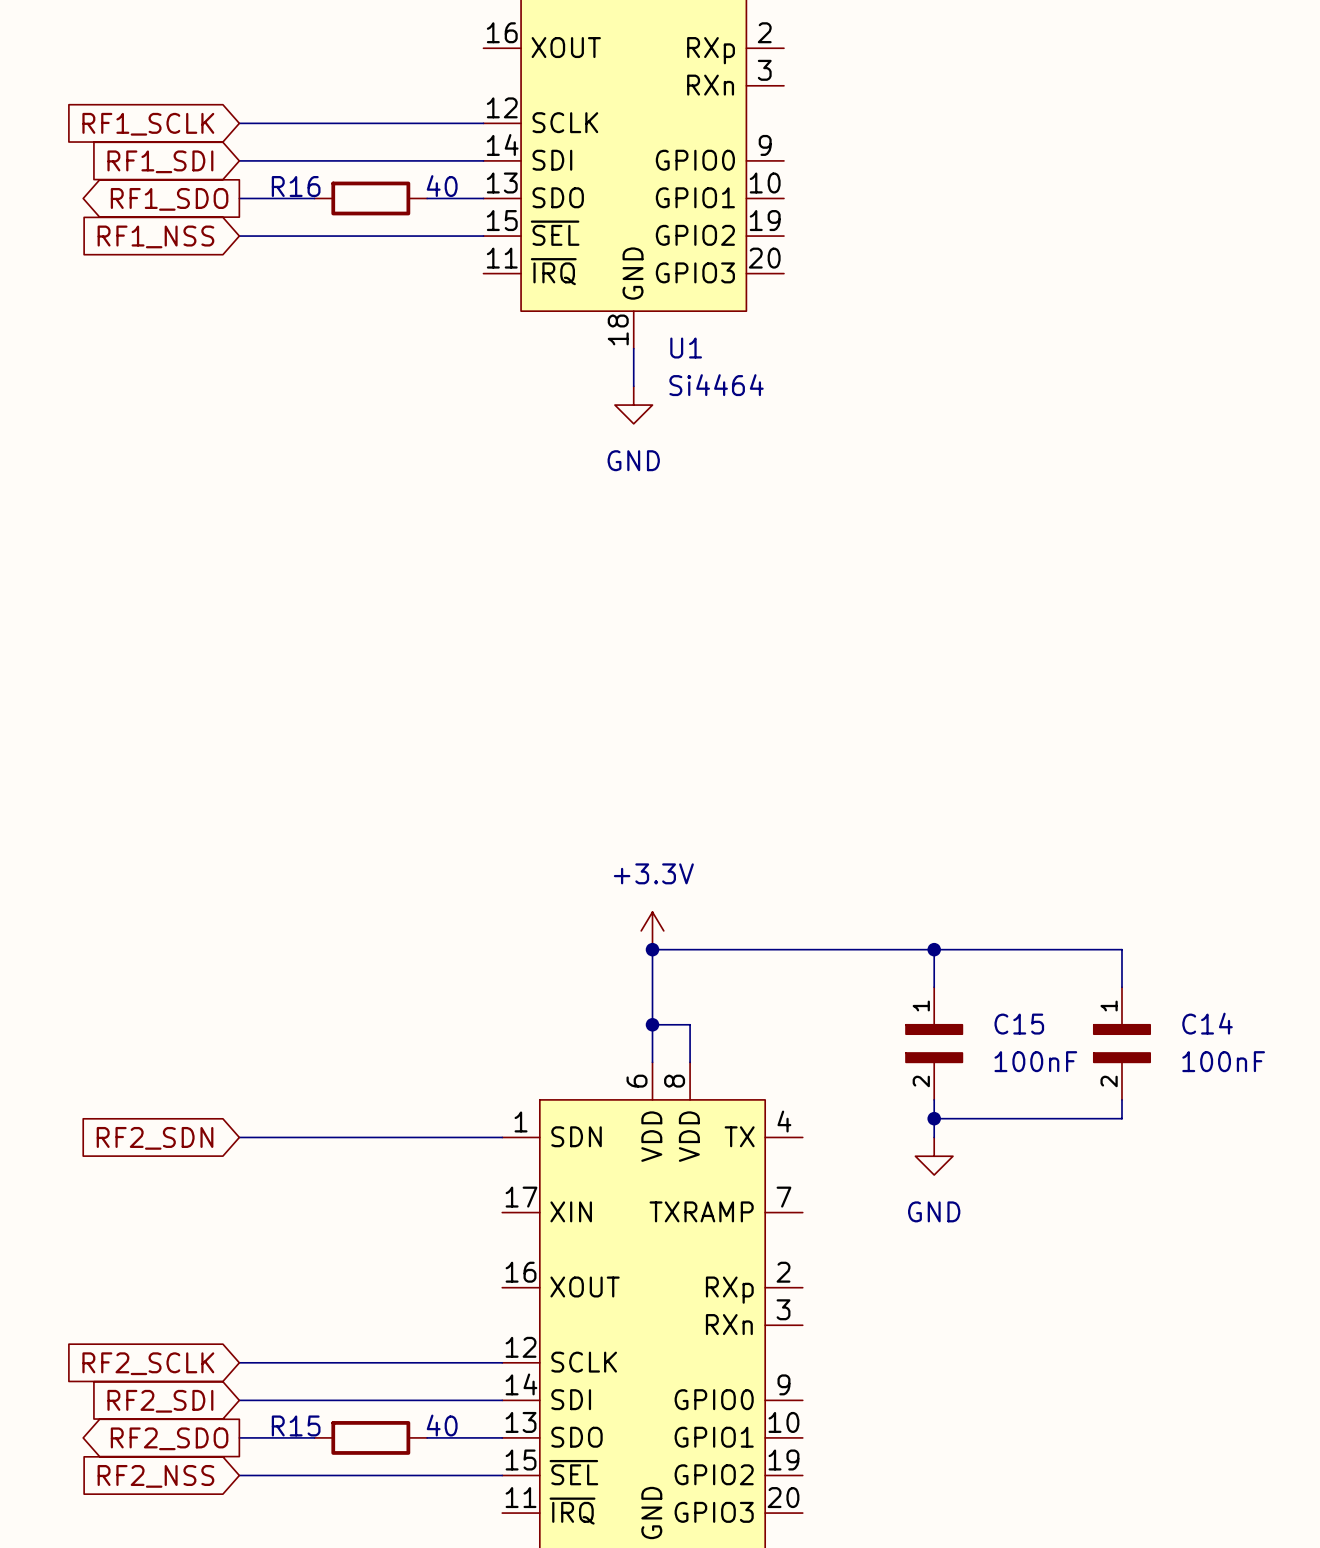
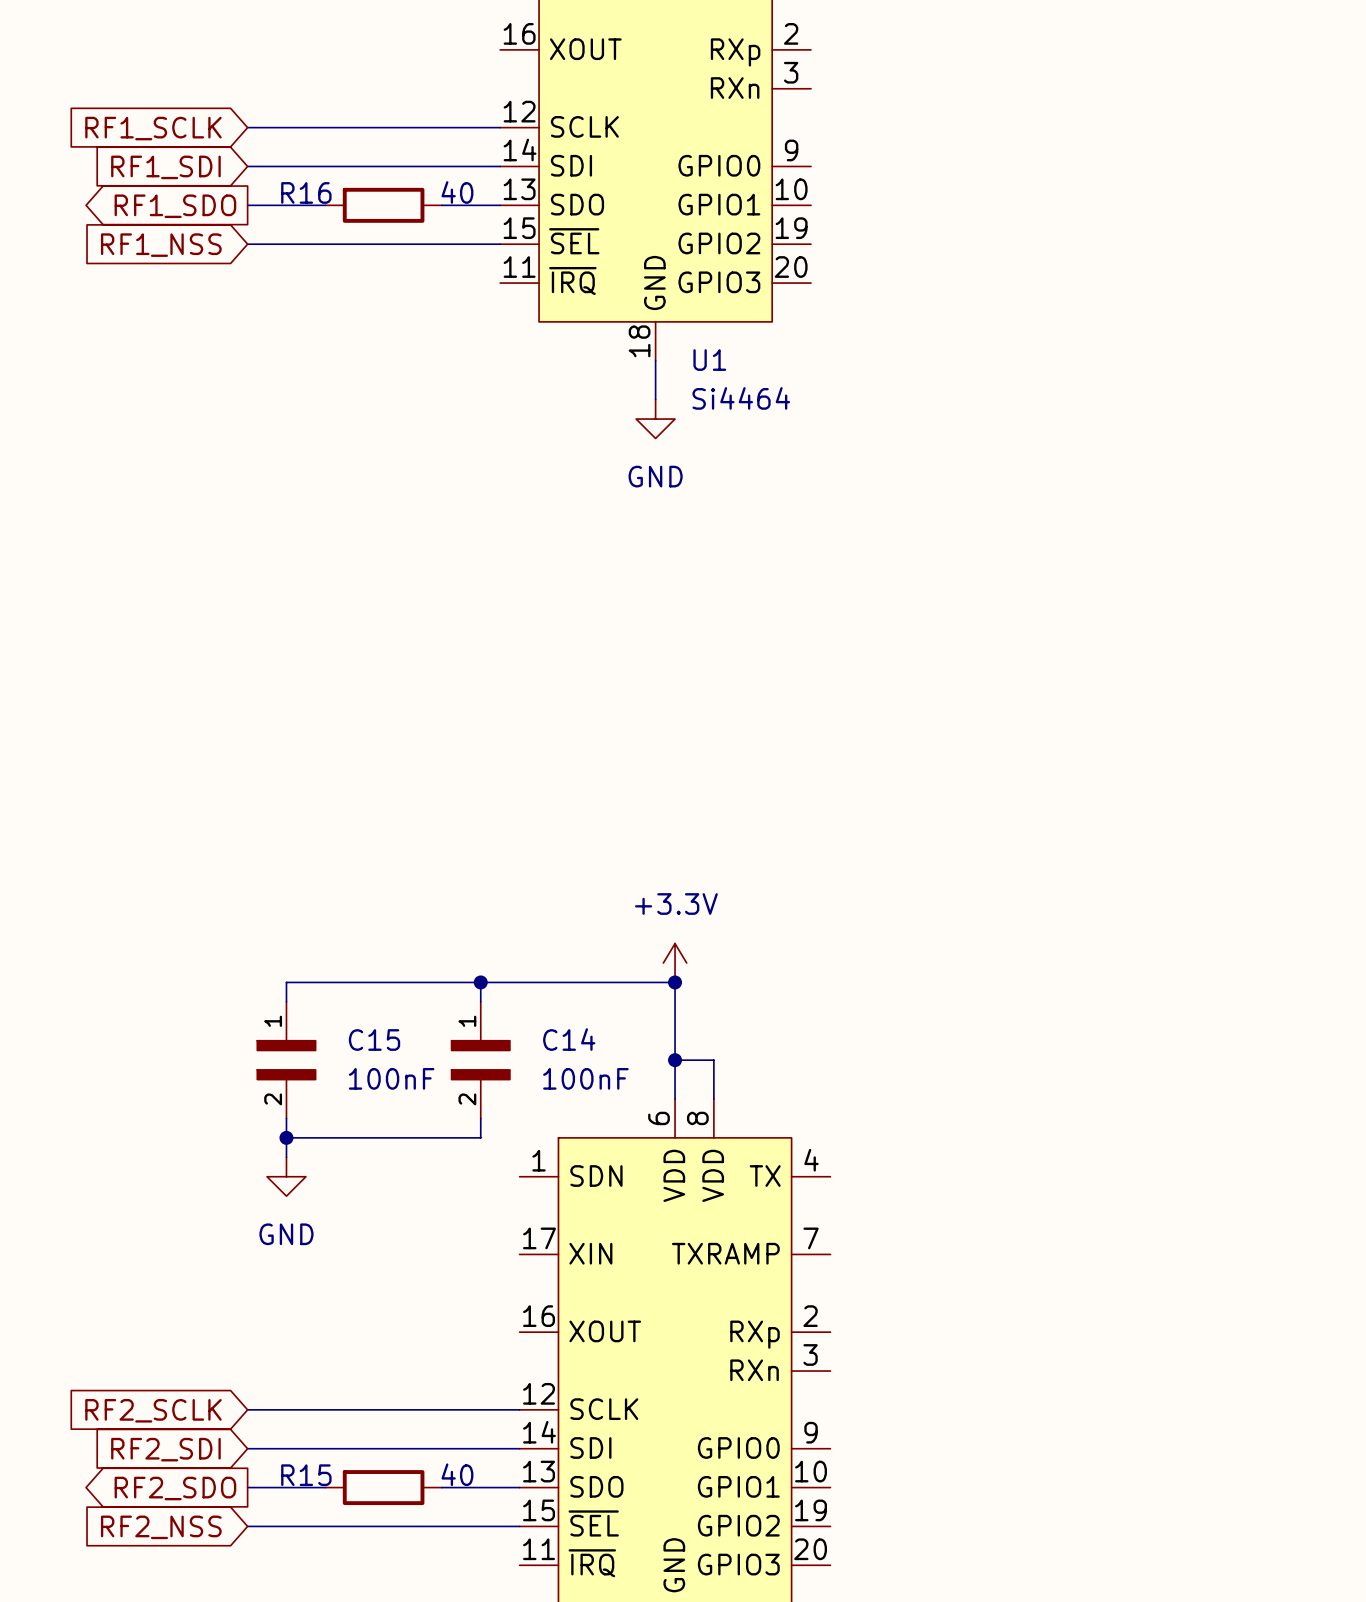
wire: none -> (480, 982) (480, 1001)
junction: none -> (480, 982)
wire: (652, 949) (1121, 949) (1121, 987) -> (675, 982) (286, 982) (286, 1001)
wire: (934, 949) (934, 987) -> none
junction: (934, 949) -> none
C15 position: (934, 1043) -> (286, 1060)
C14 position: (1121, 1043) -> (480, 1060)
wire: none -> (286, 1118) (286, 1157)
wire: none -> (480, 1118) (480, 1137) (286, 1137)
junction: none -> (286, 1137)
wire: (934, 1099) (934, 1137) -> none
wire: (1121, 1099) (1121, 1118) (934, 1118) -> none
junction: (934, 1118) -> none
wire: (239, 1137) (502, 1137) -> none
power symbol: none -> GND (286, 1176)
global label: RF2_SDN (155, 1138) -> none
power symbol: GND (934, 1156) -> none

